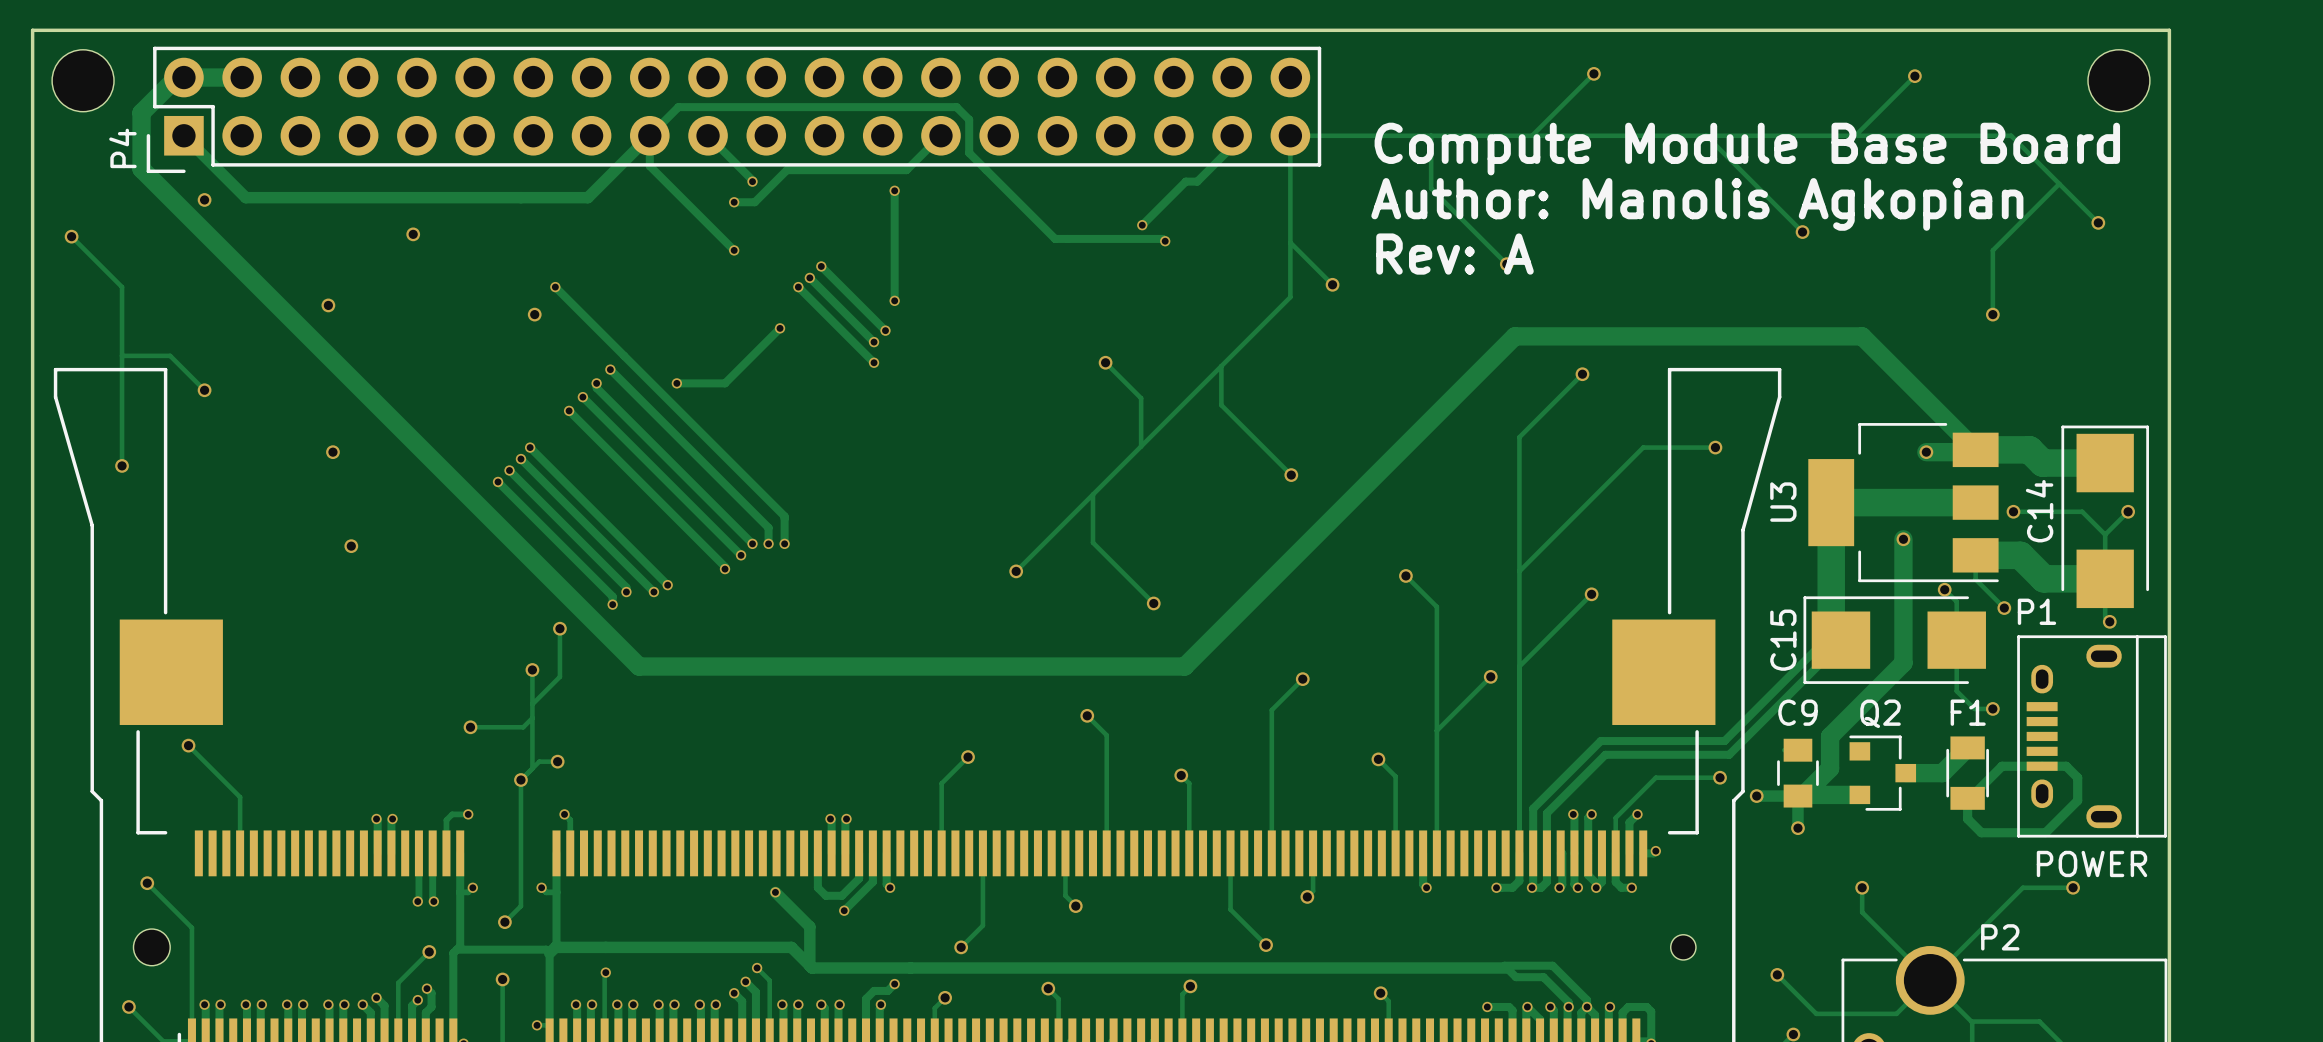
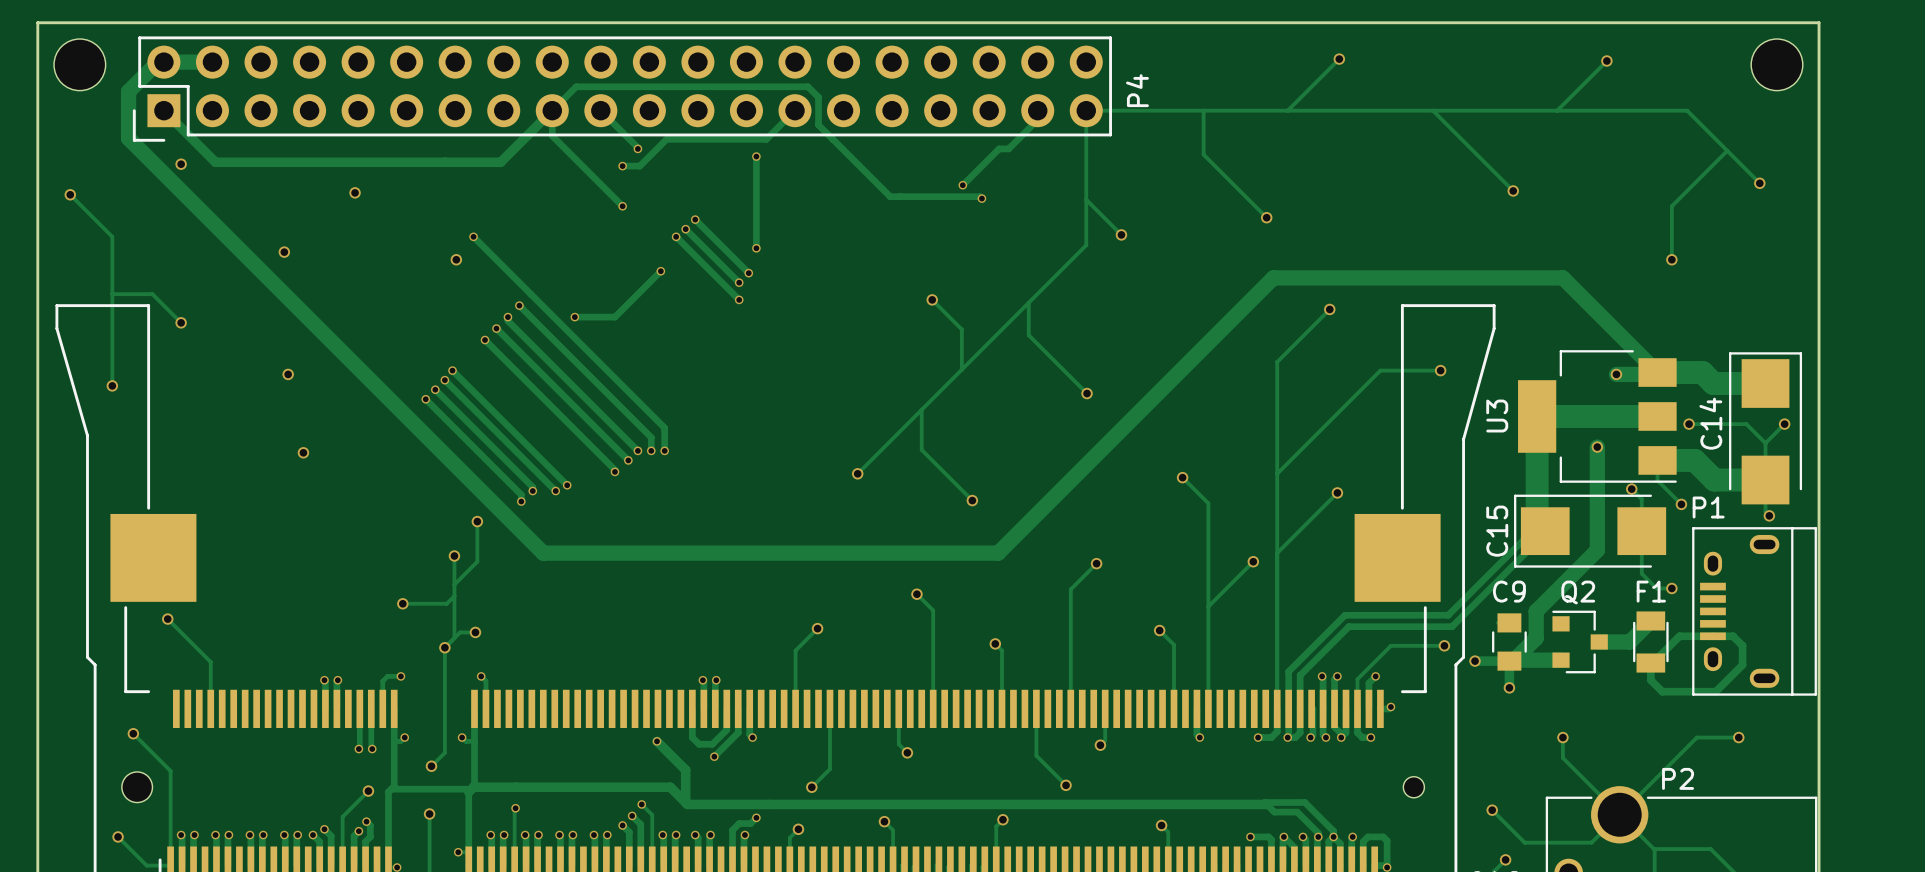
P4 name position: P4 (122, 148) -> P4 (1137, 90)
text: Compute Module Base Board (1747, 149) -> none
text: Author: Manolis Agkopian (1697, 204) -> none
text: Rev: A (1455, 254) -> none
text: POWER (2091, 863) -> none

